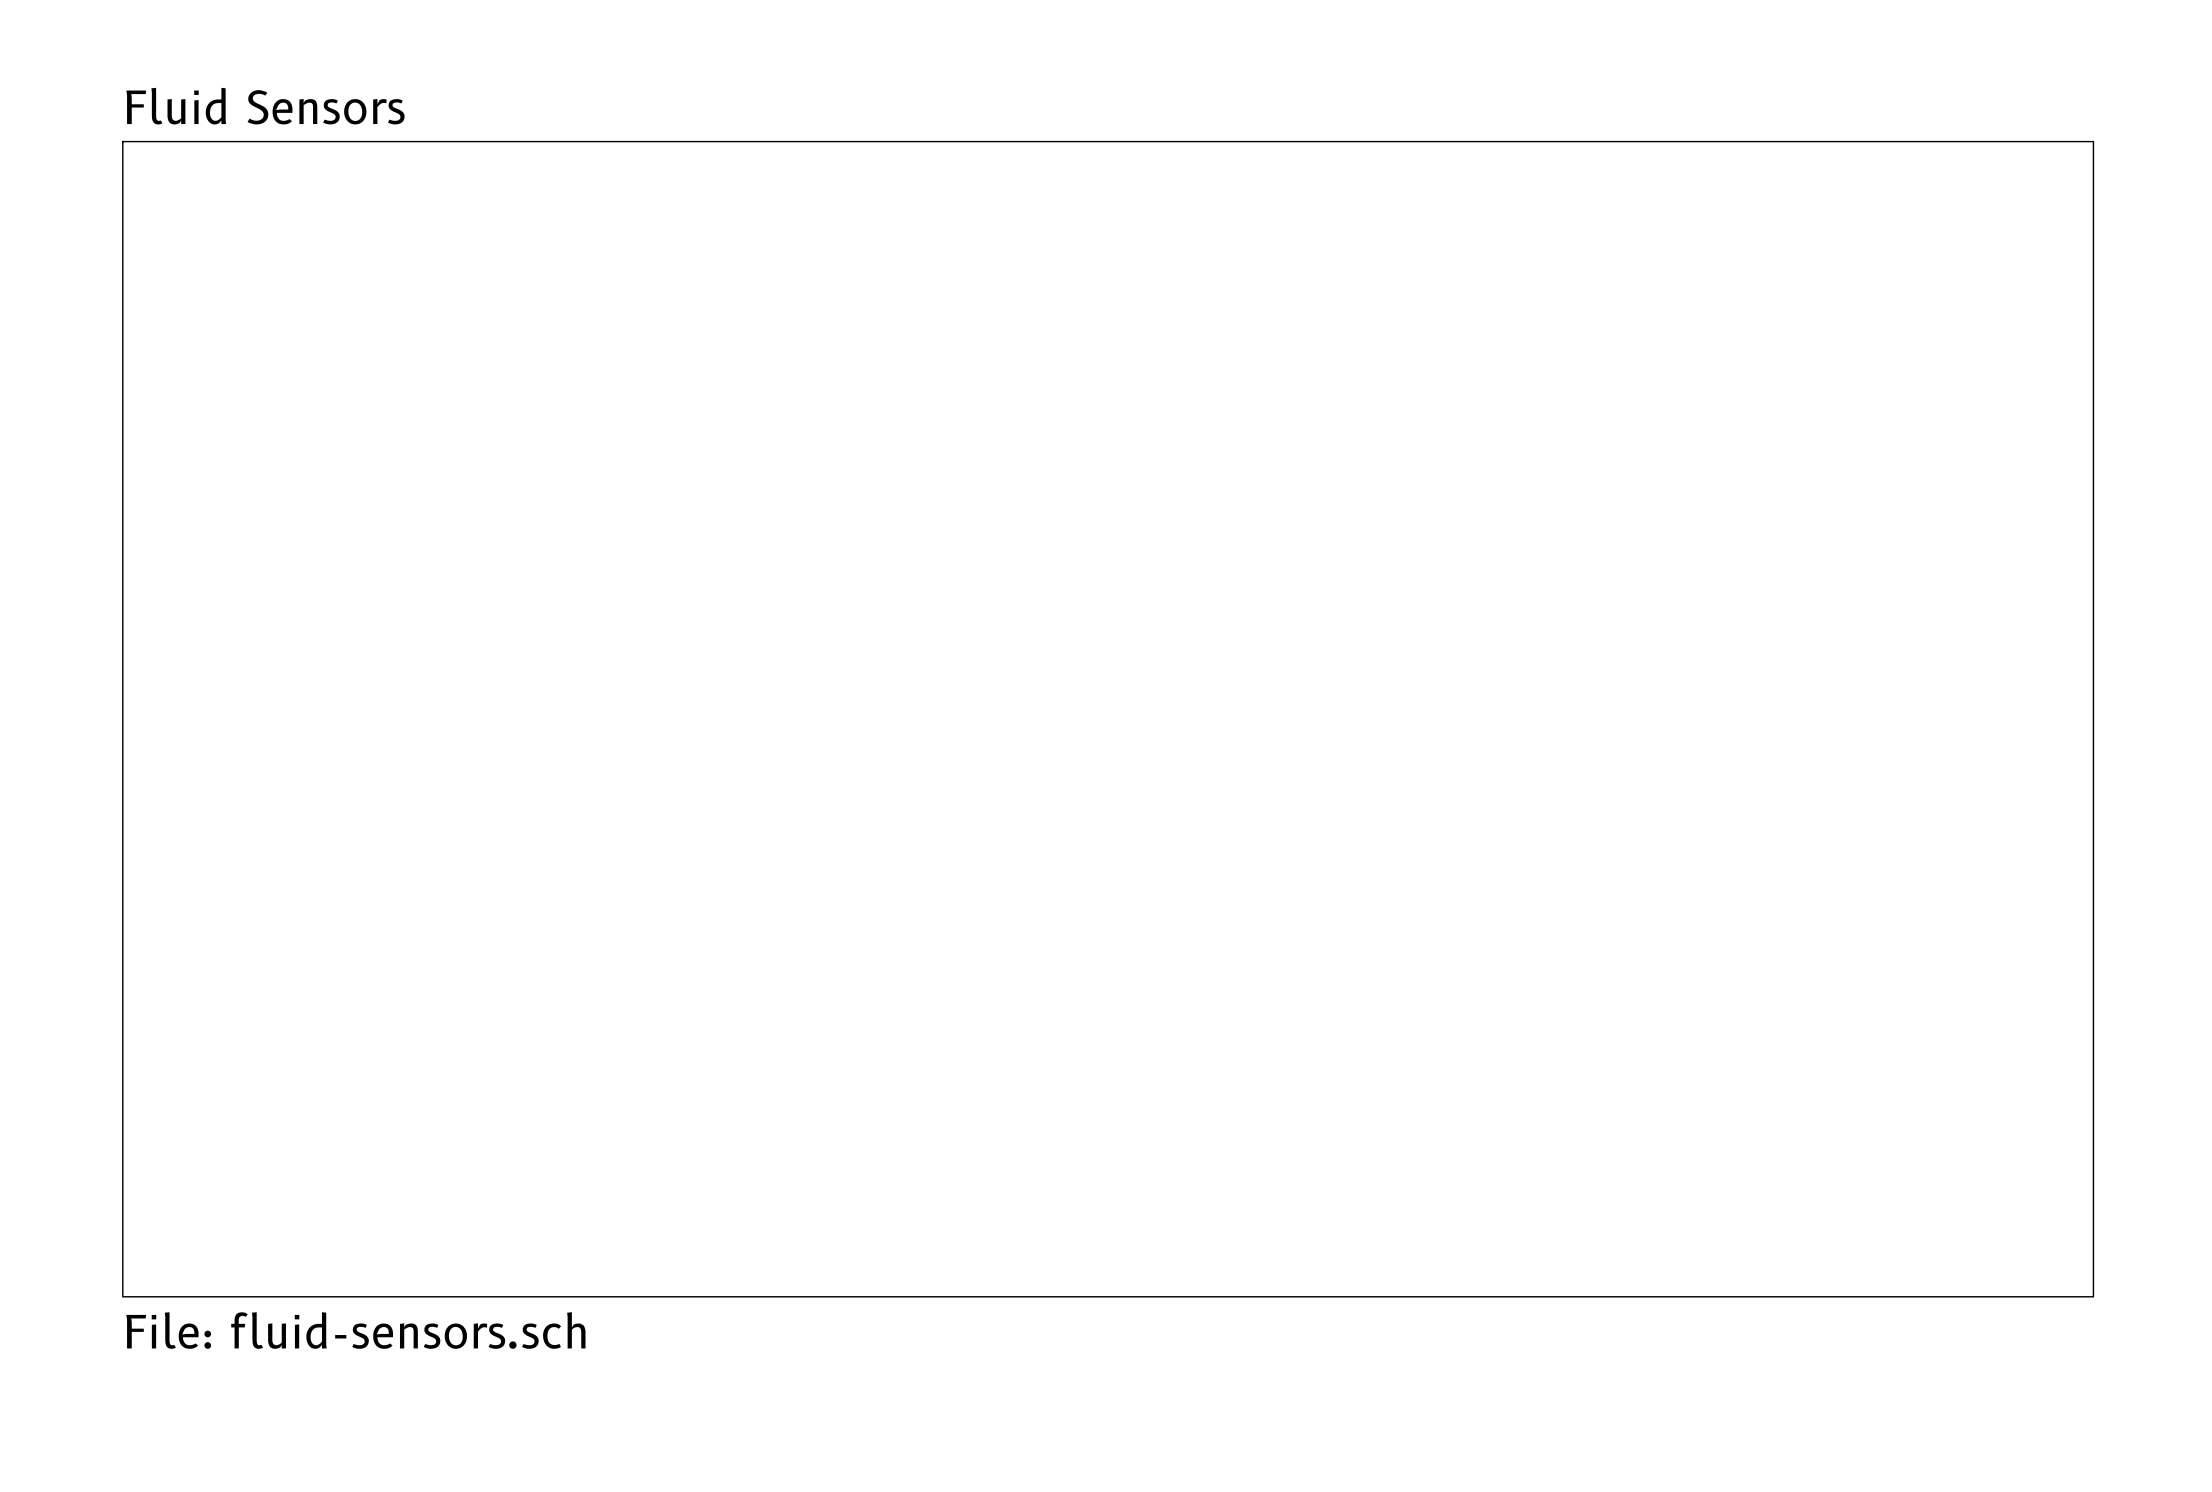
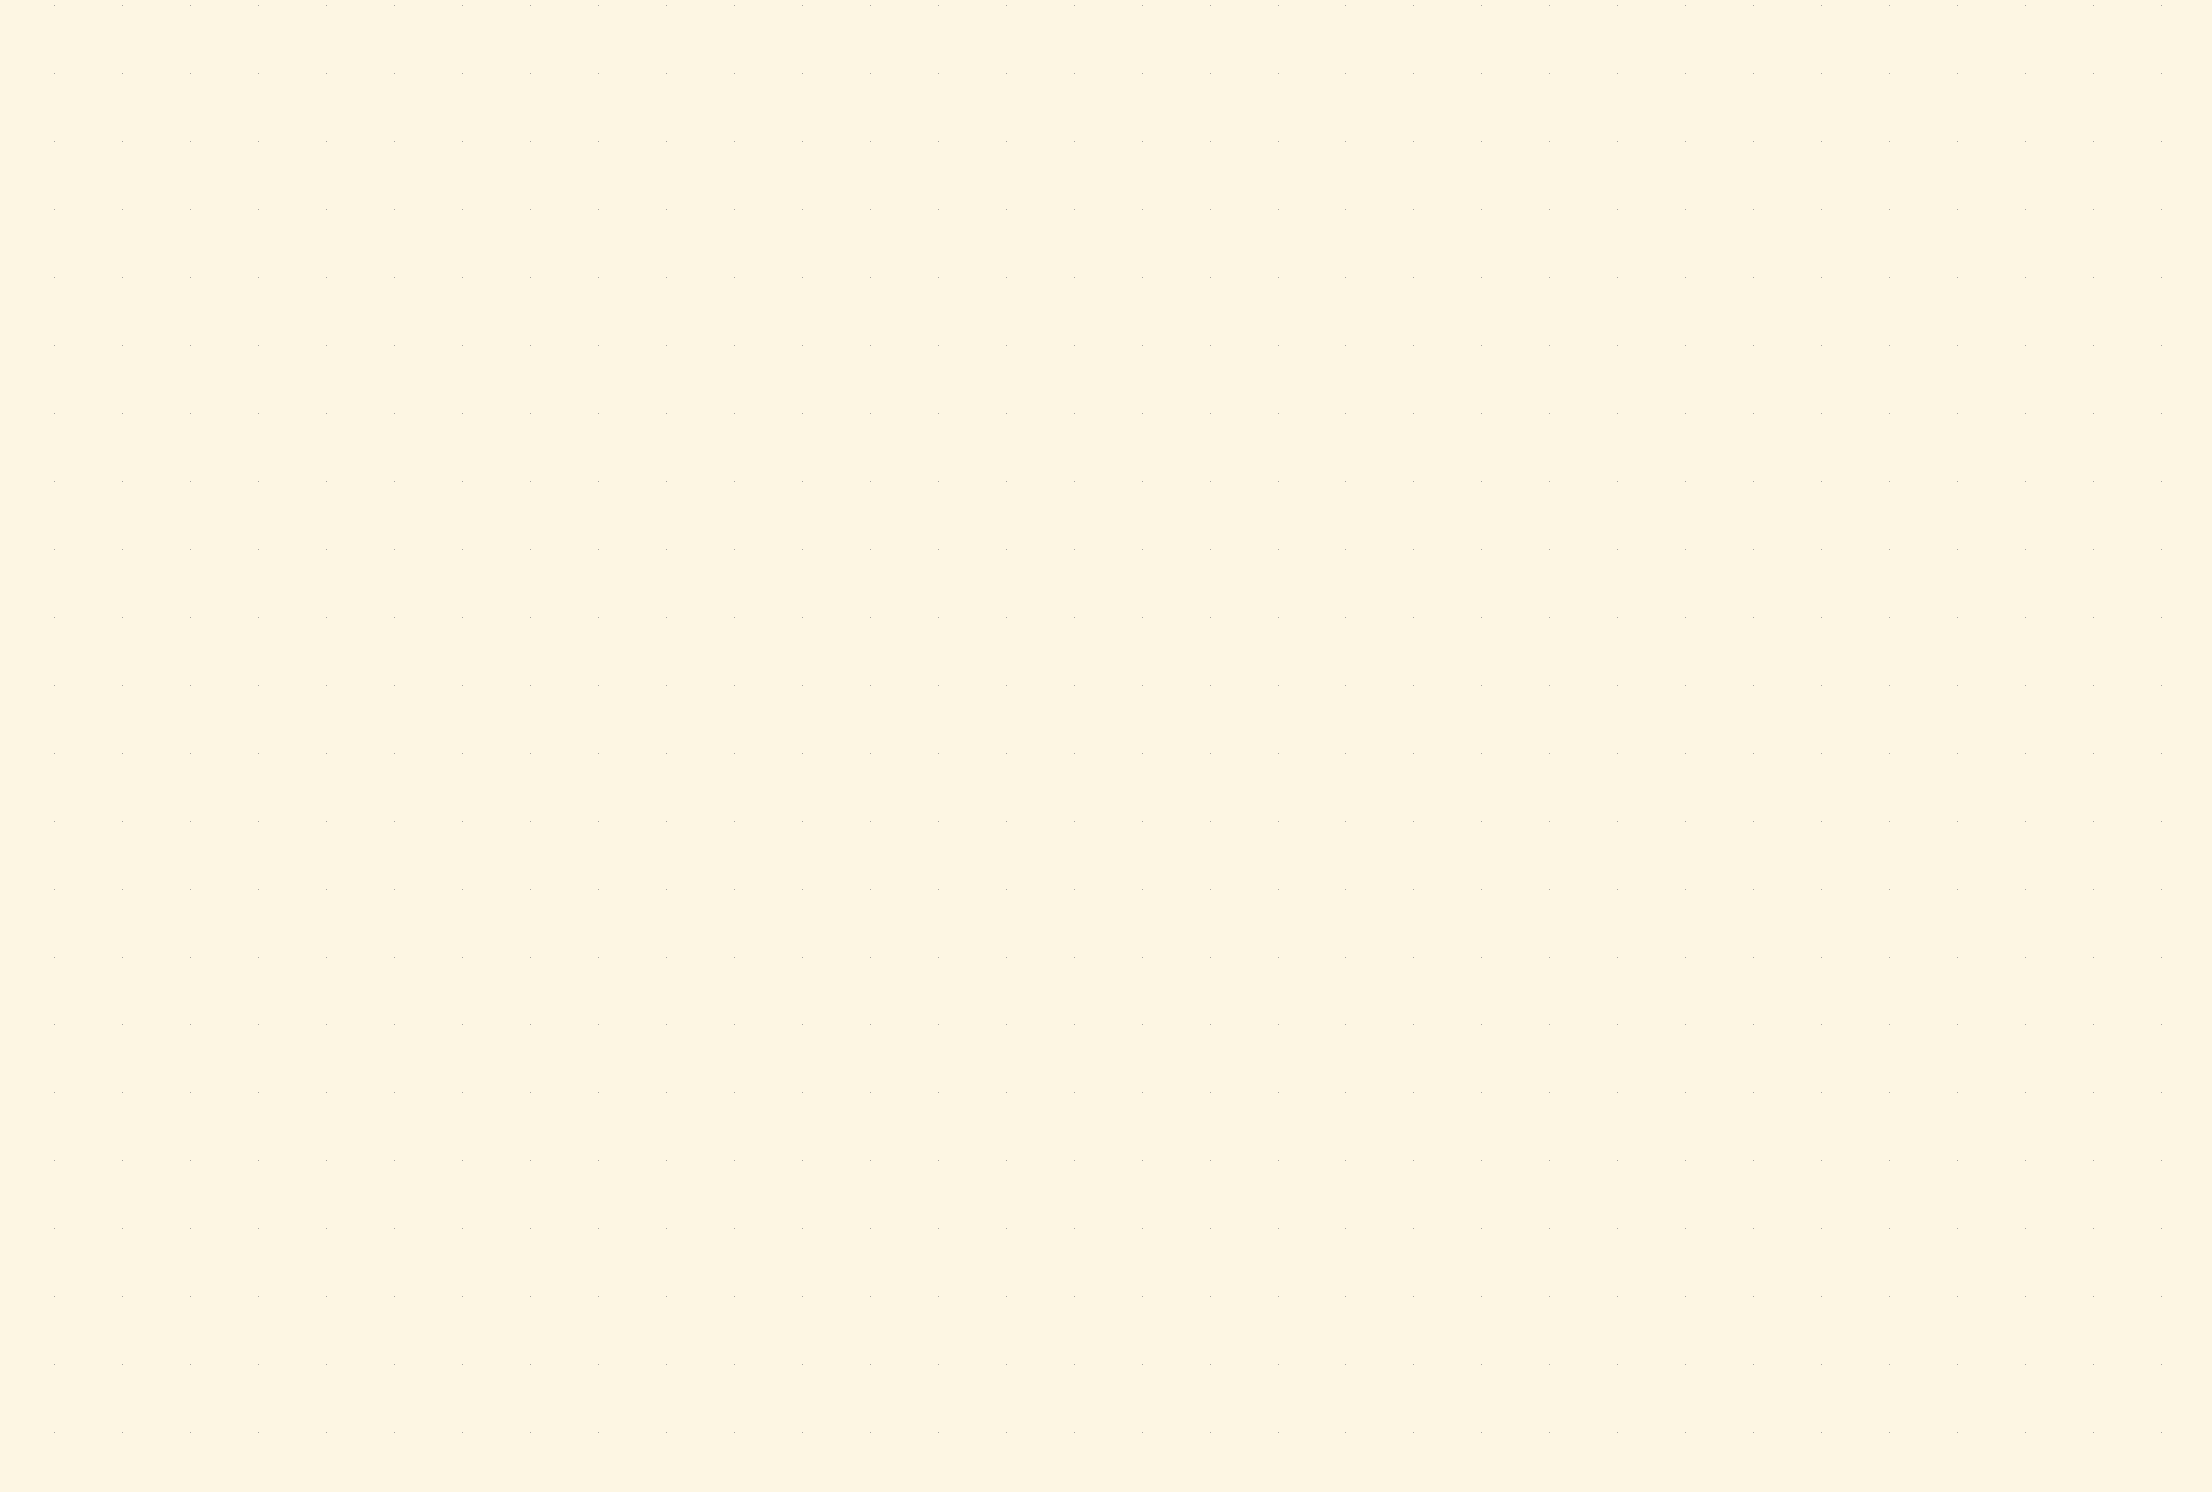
sheet Fluid Sensors: File: fluid-sensors.sch (1108, 719) -> none

